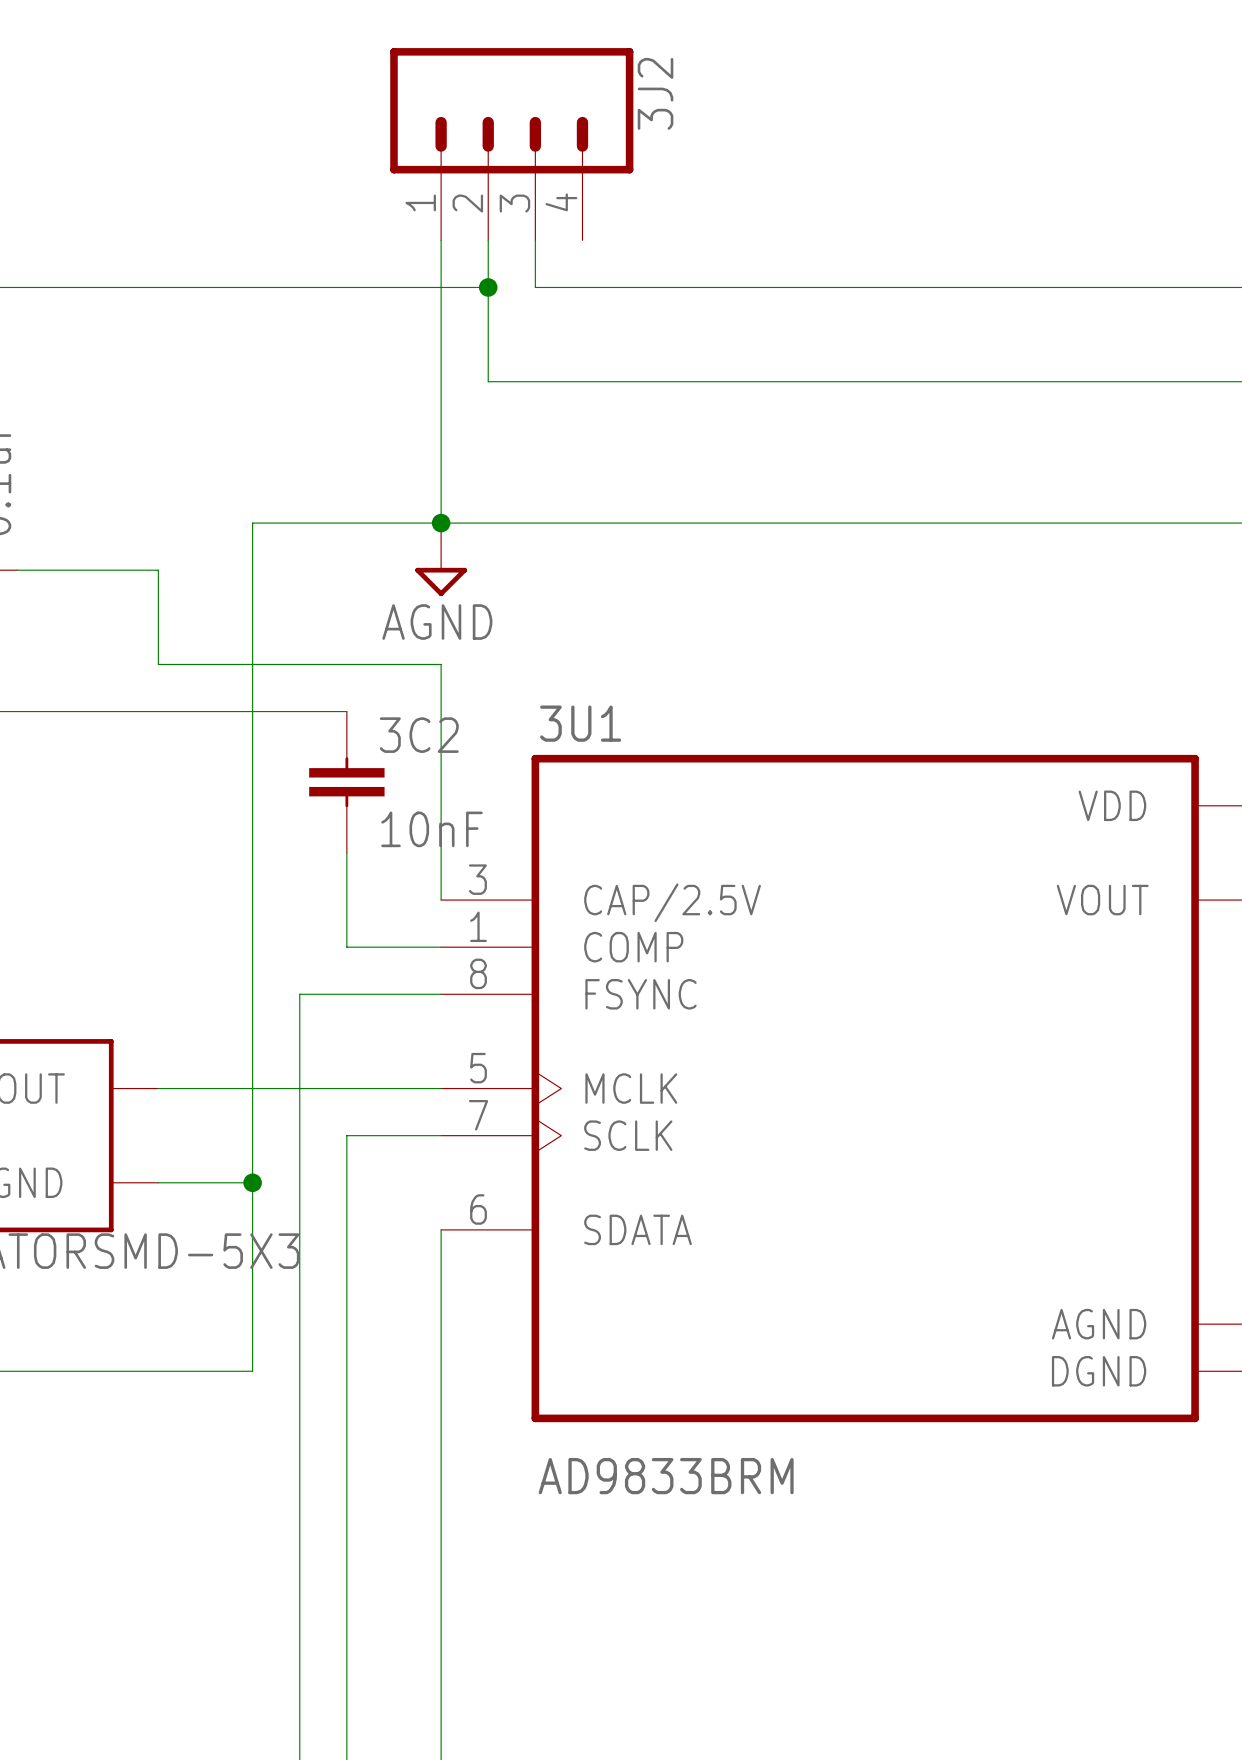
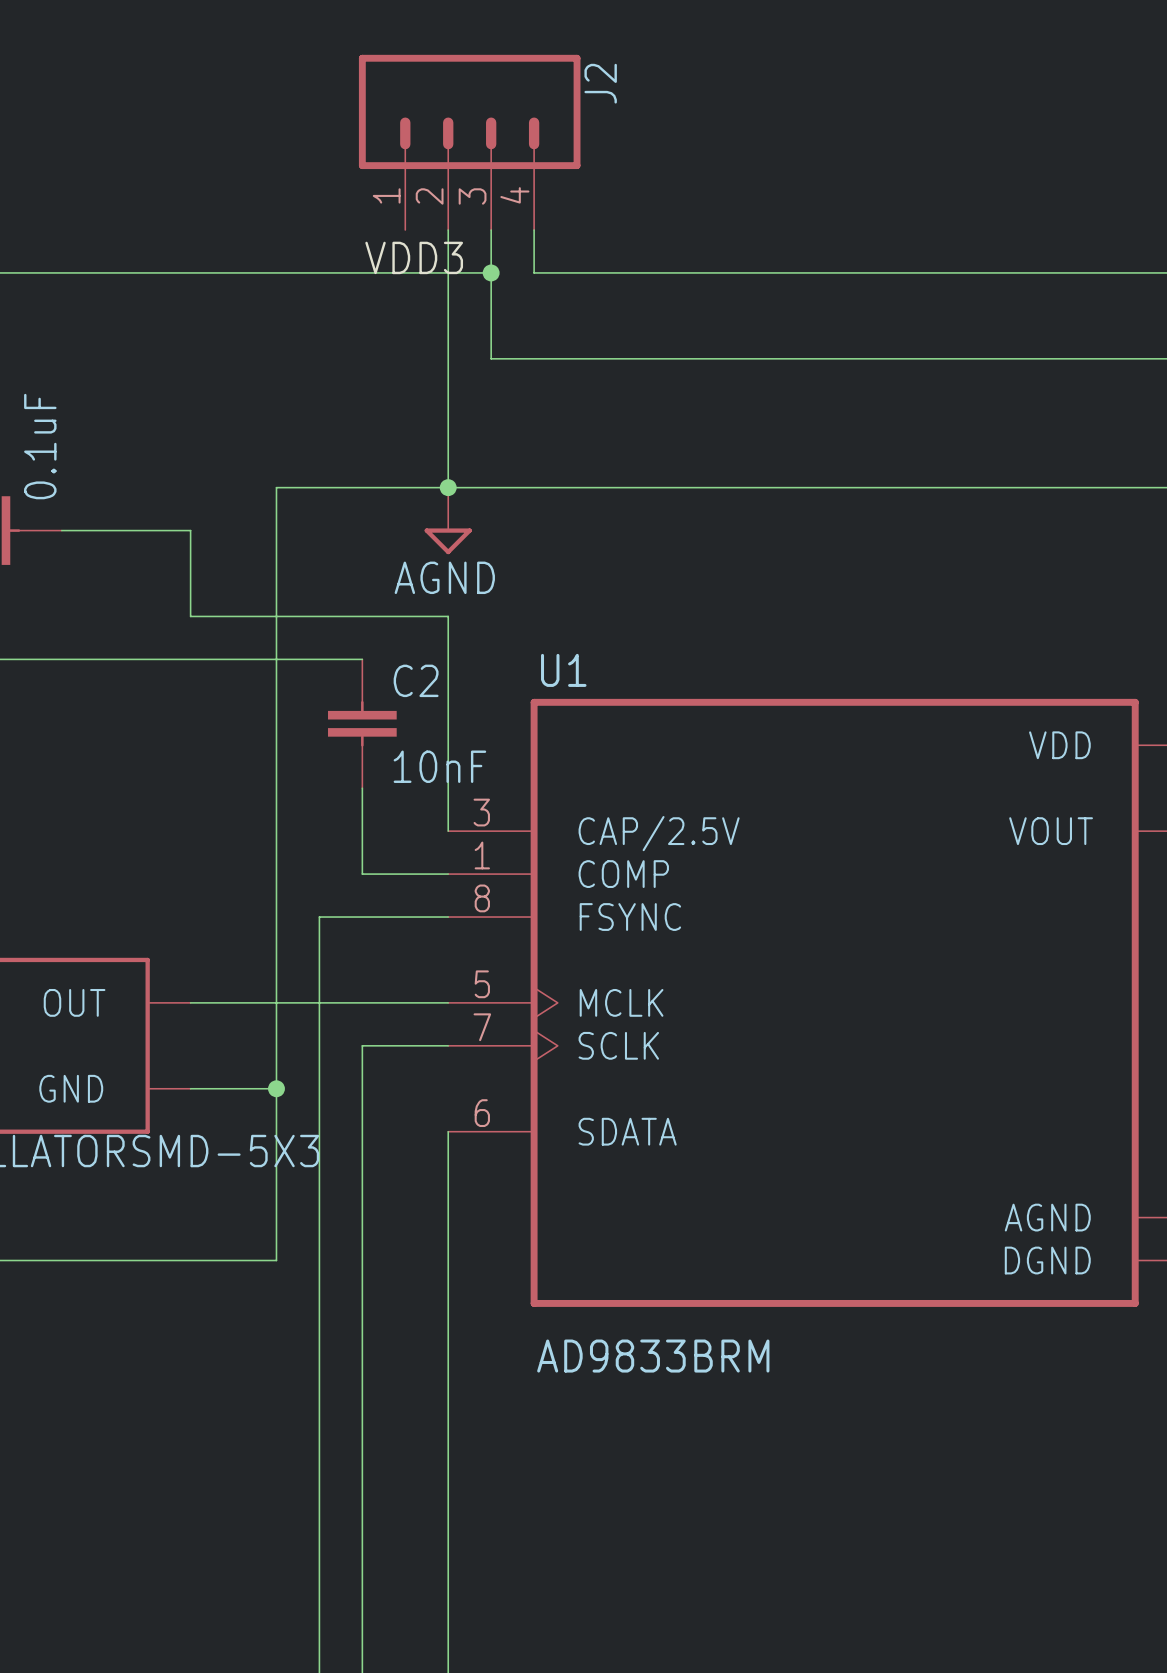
J2: none -> (469, 142)
3J2: (511, 144) -> none
label: none -> VDD3 (414, 257)
3U1 name: 3U1 (580, 723) -> U1 (563, 670)
3C2 name: 3C2 (419, 735) -> C2 (416, 680)

